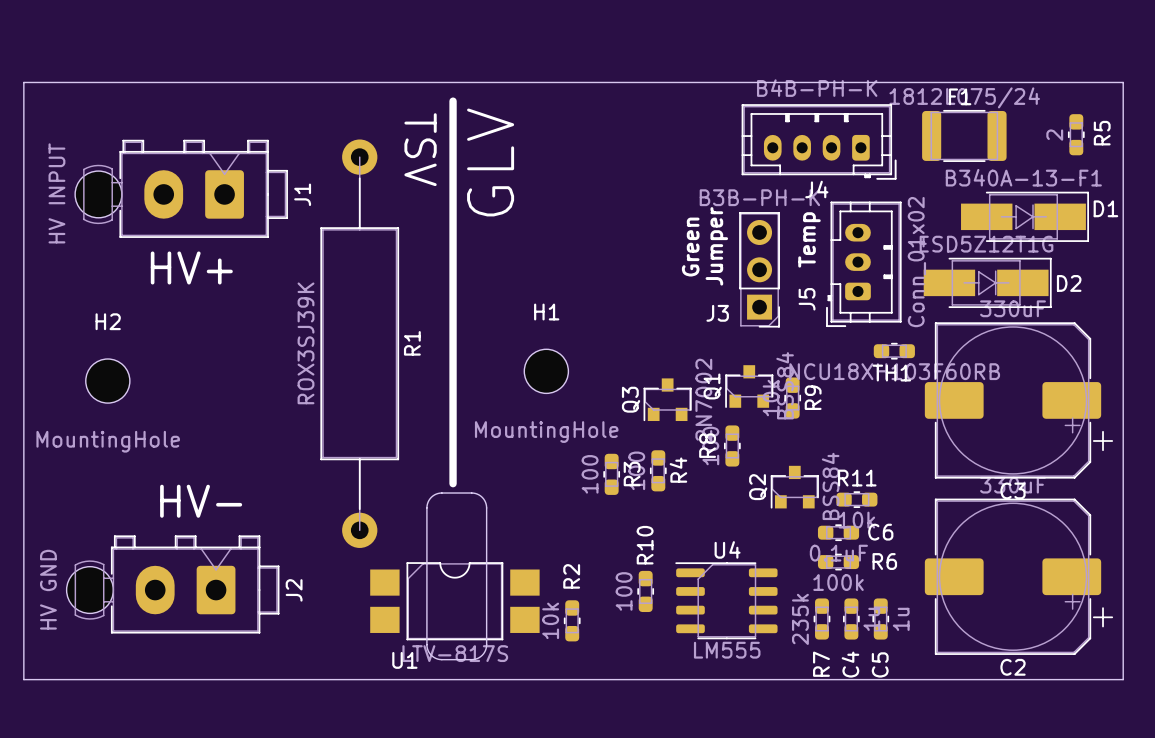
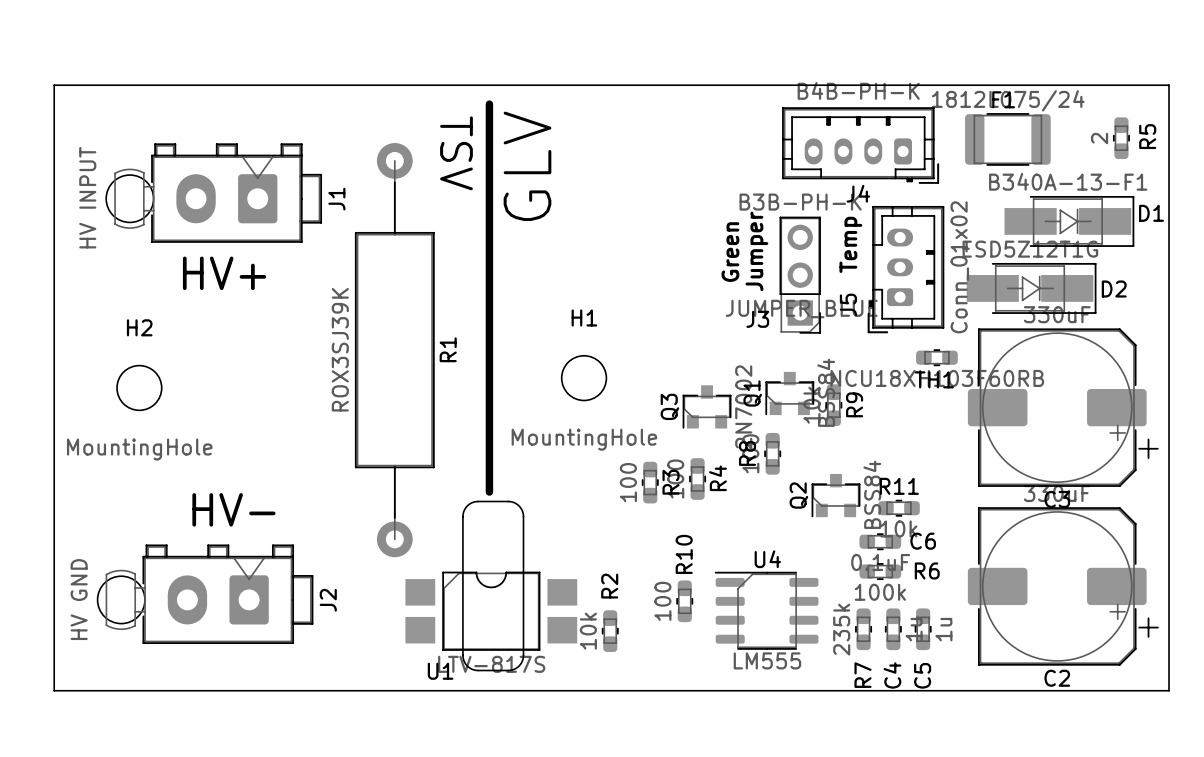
drawing: none -> [725, 299, 878, 319]

